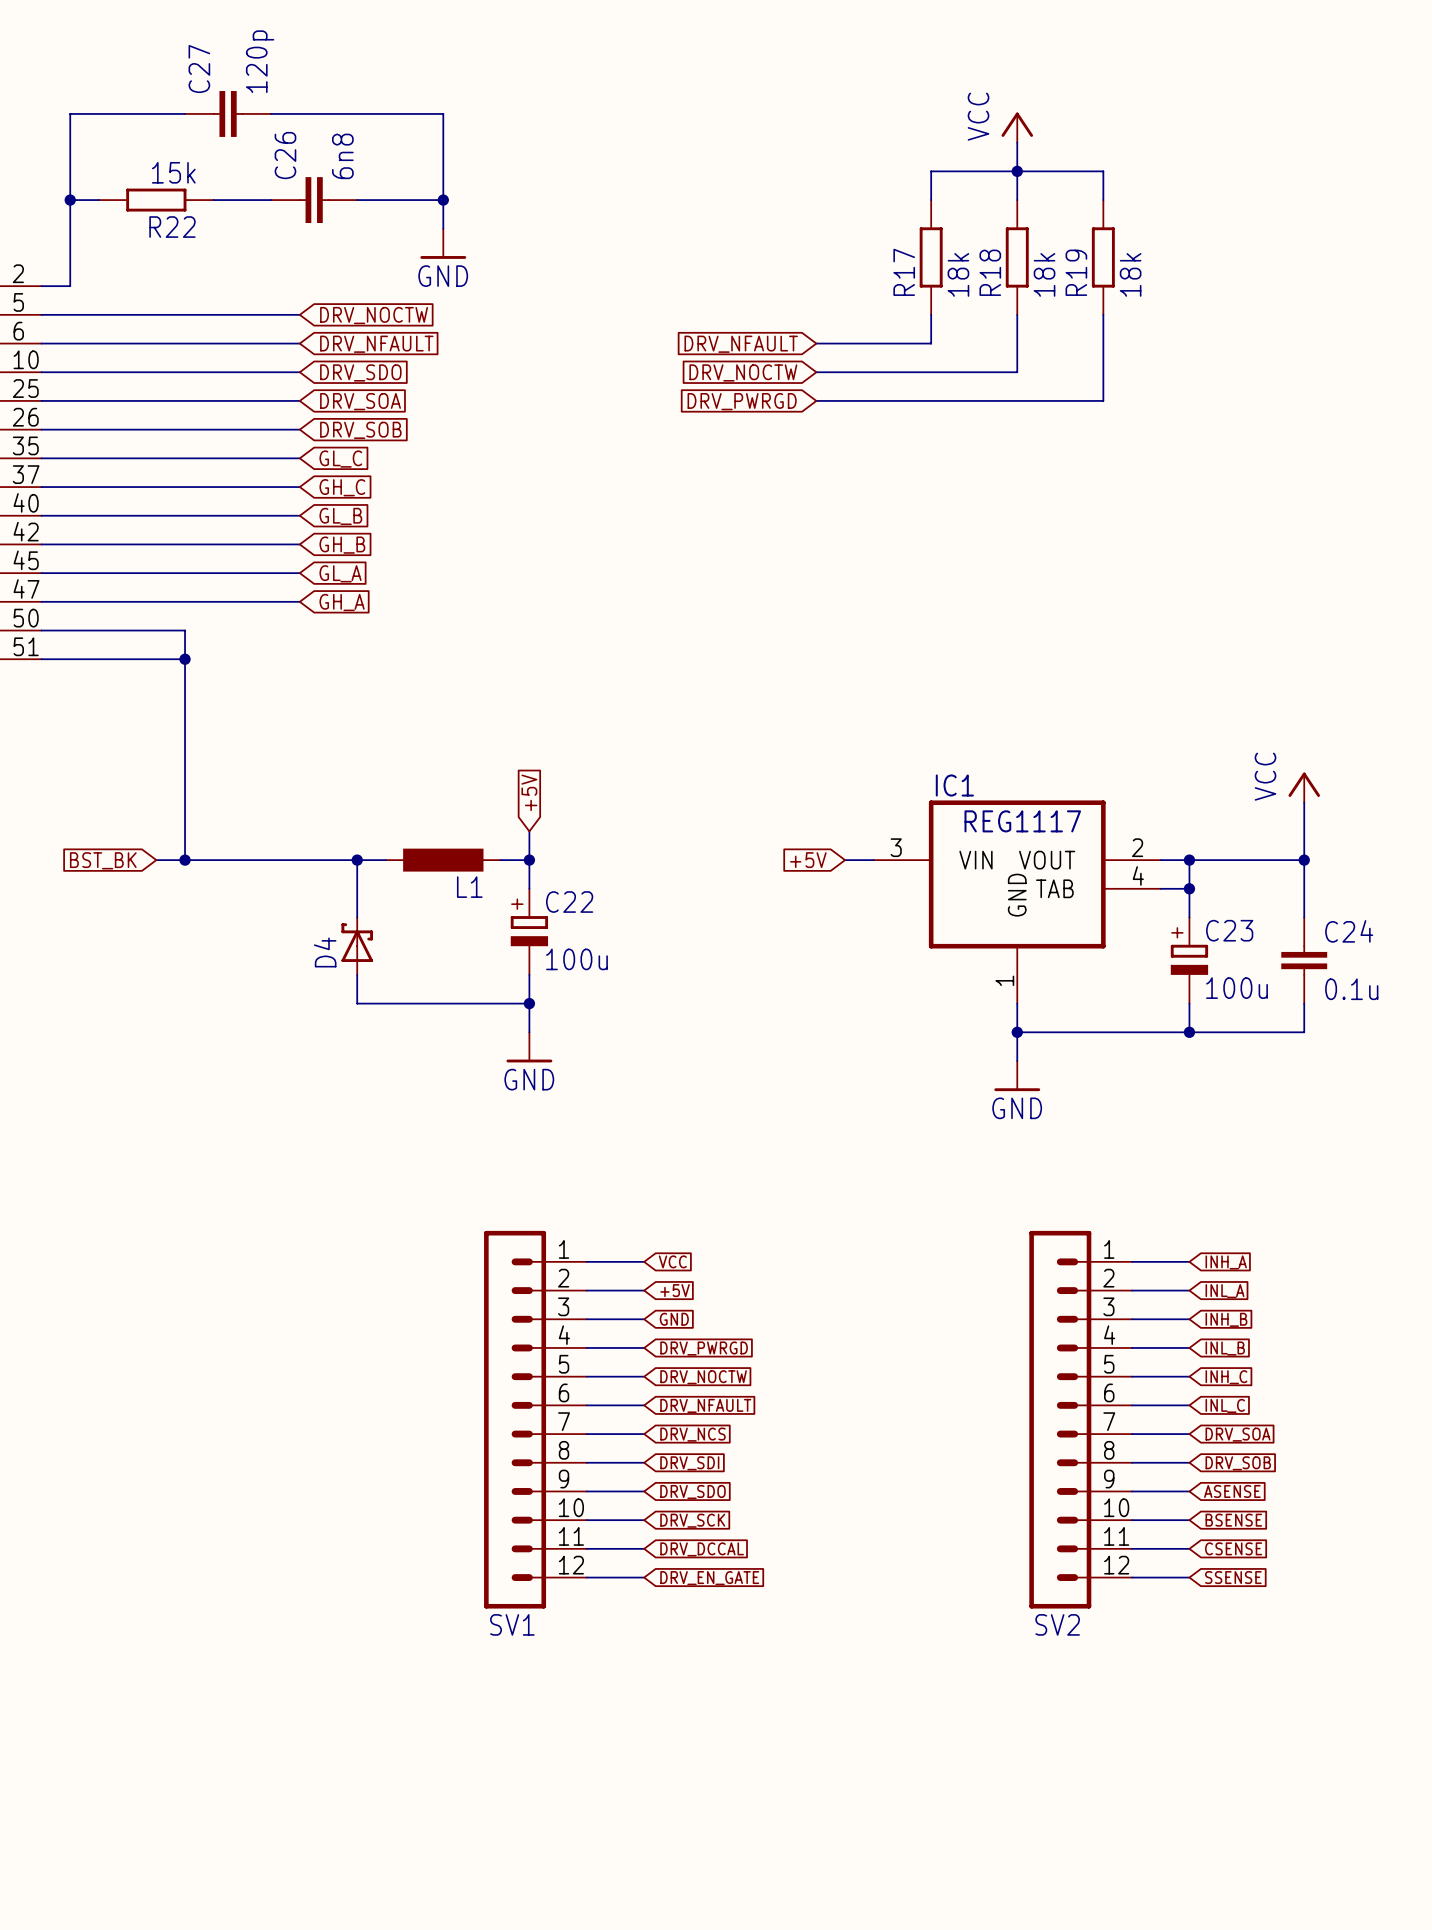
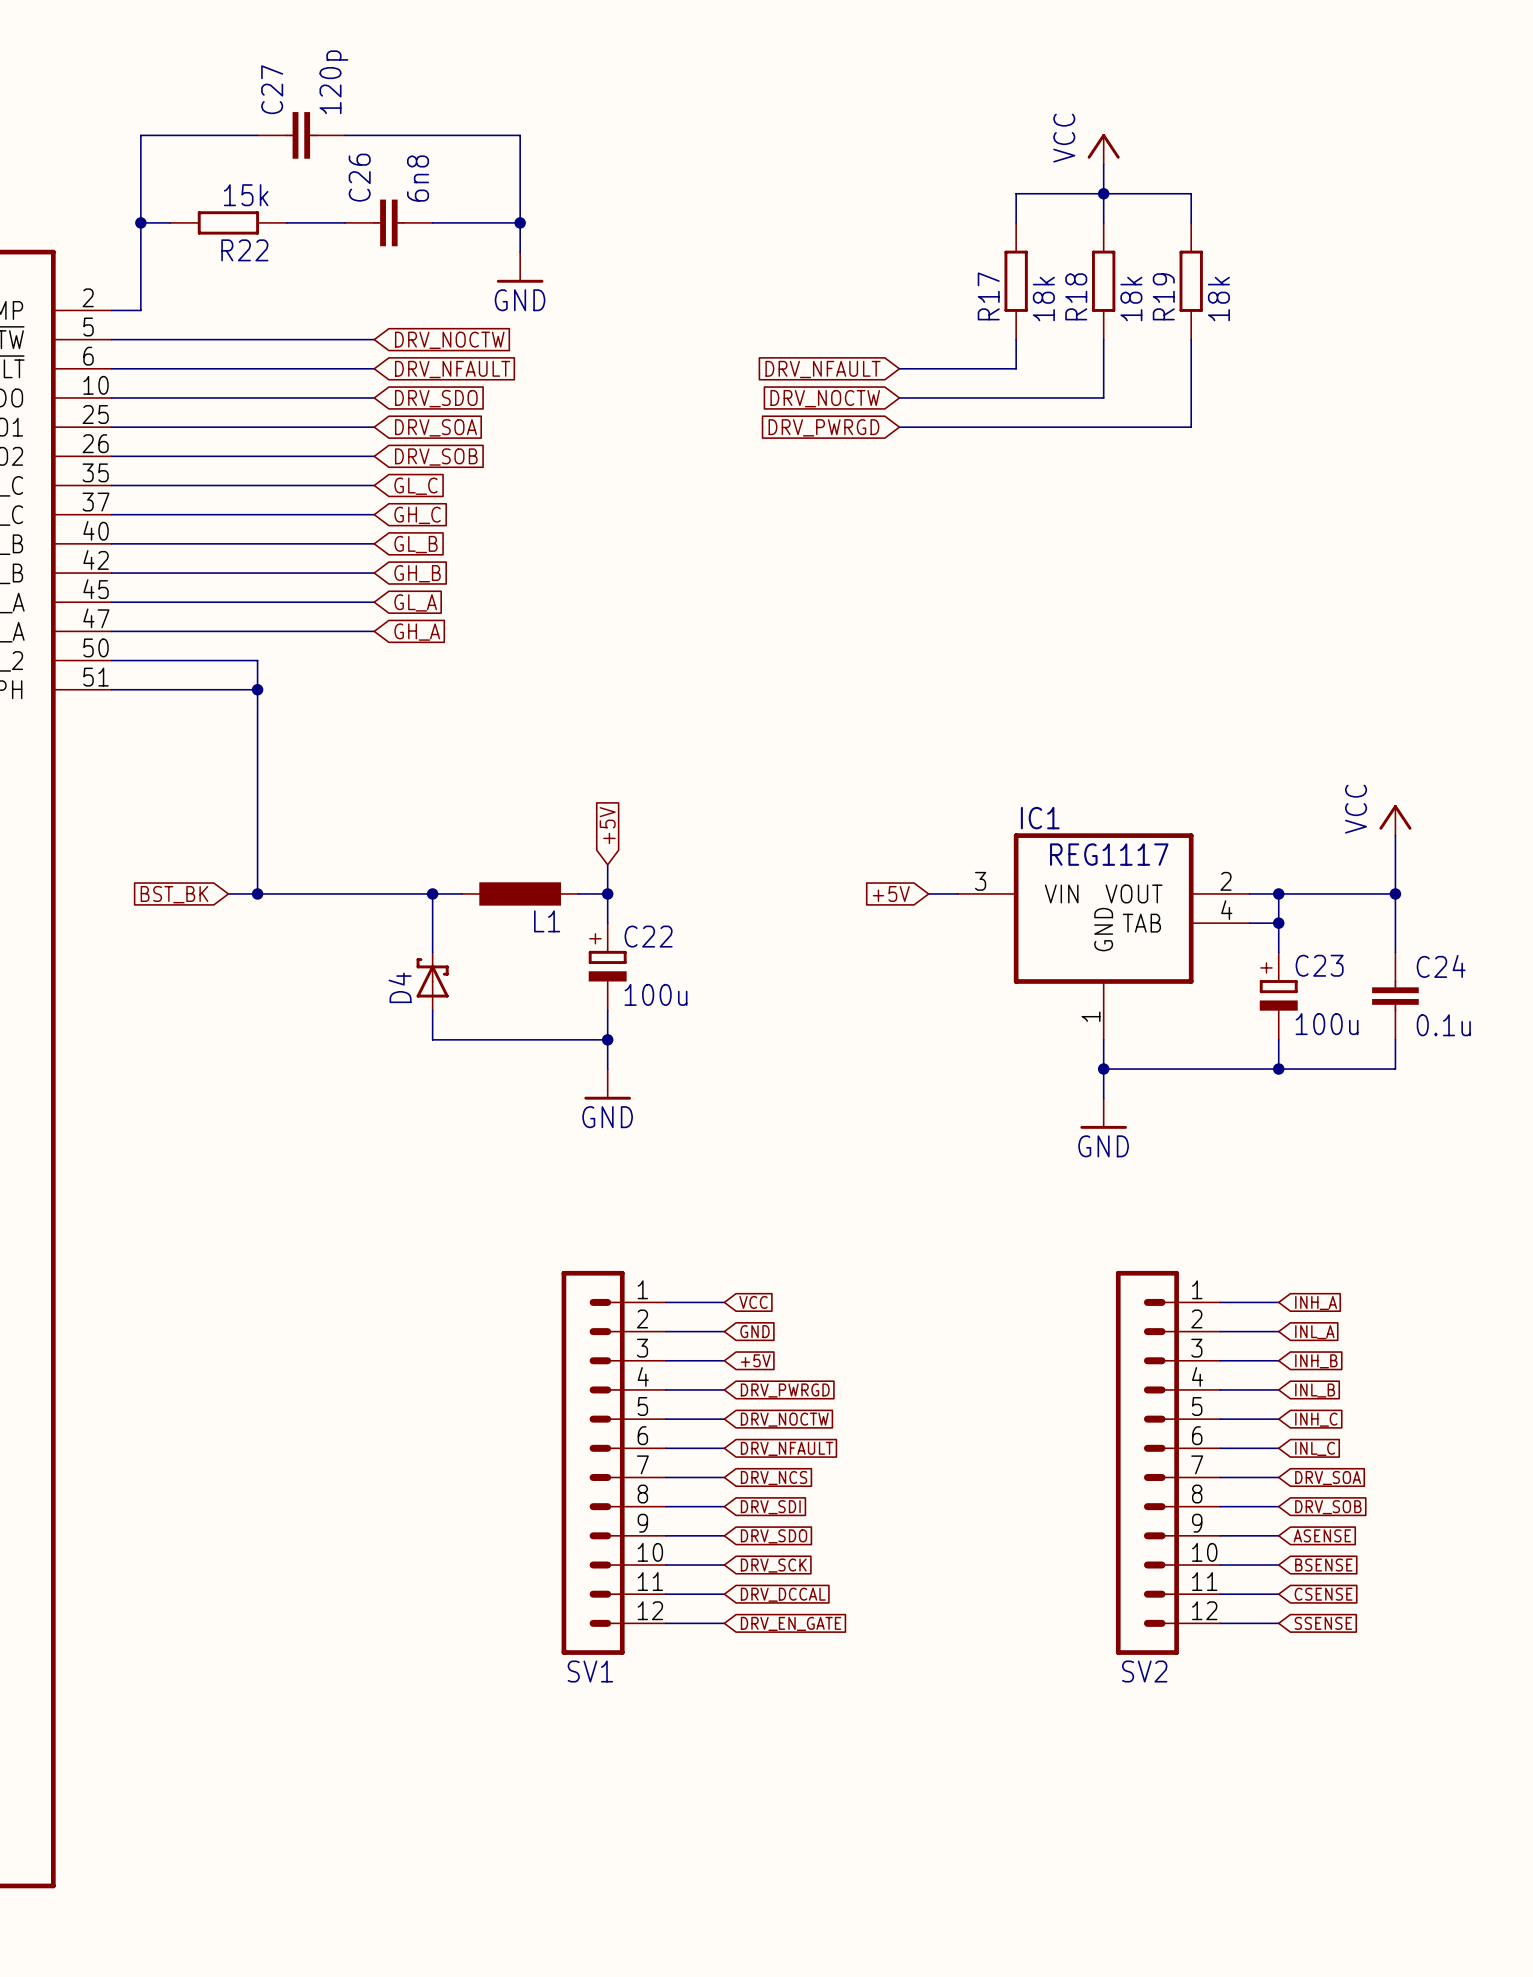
global label: +5V (675, 1290) -> GND (755, 1331)
global label: GND (674, 1319) -> +5V (755, 1360)

